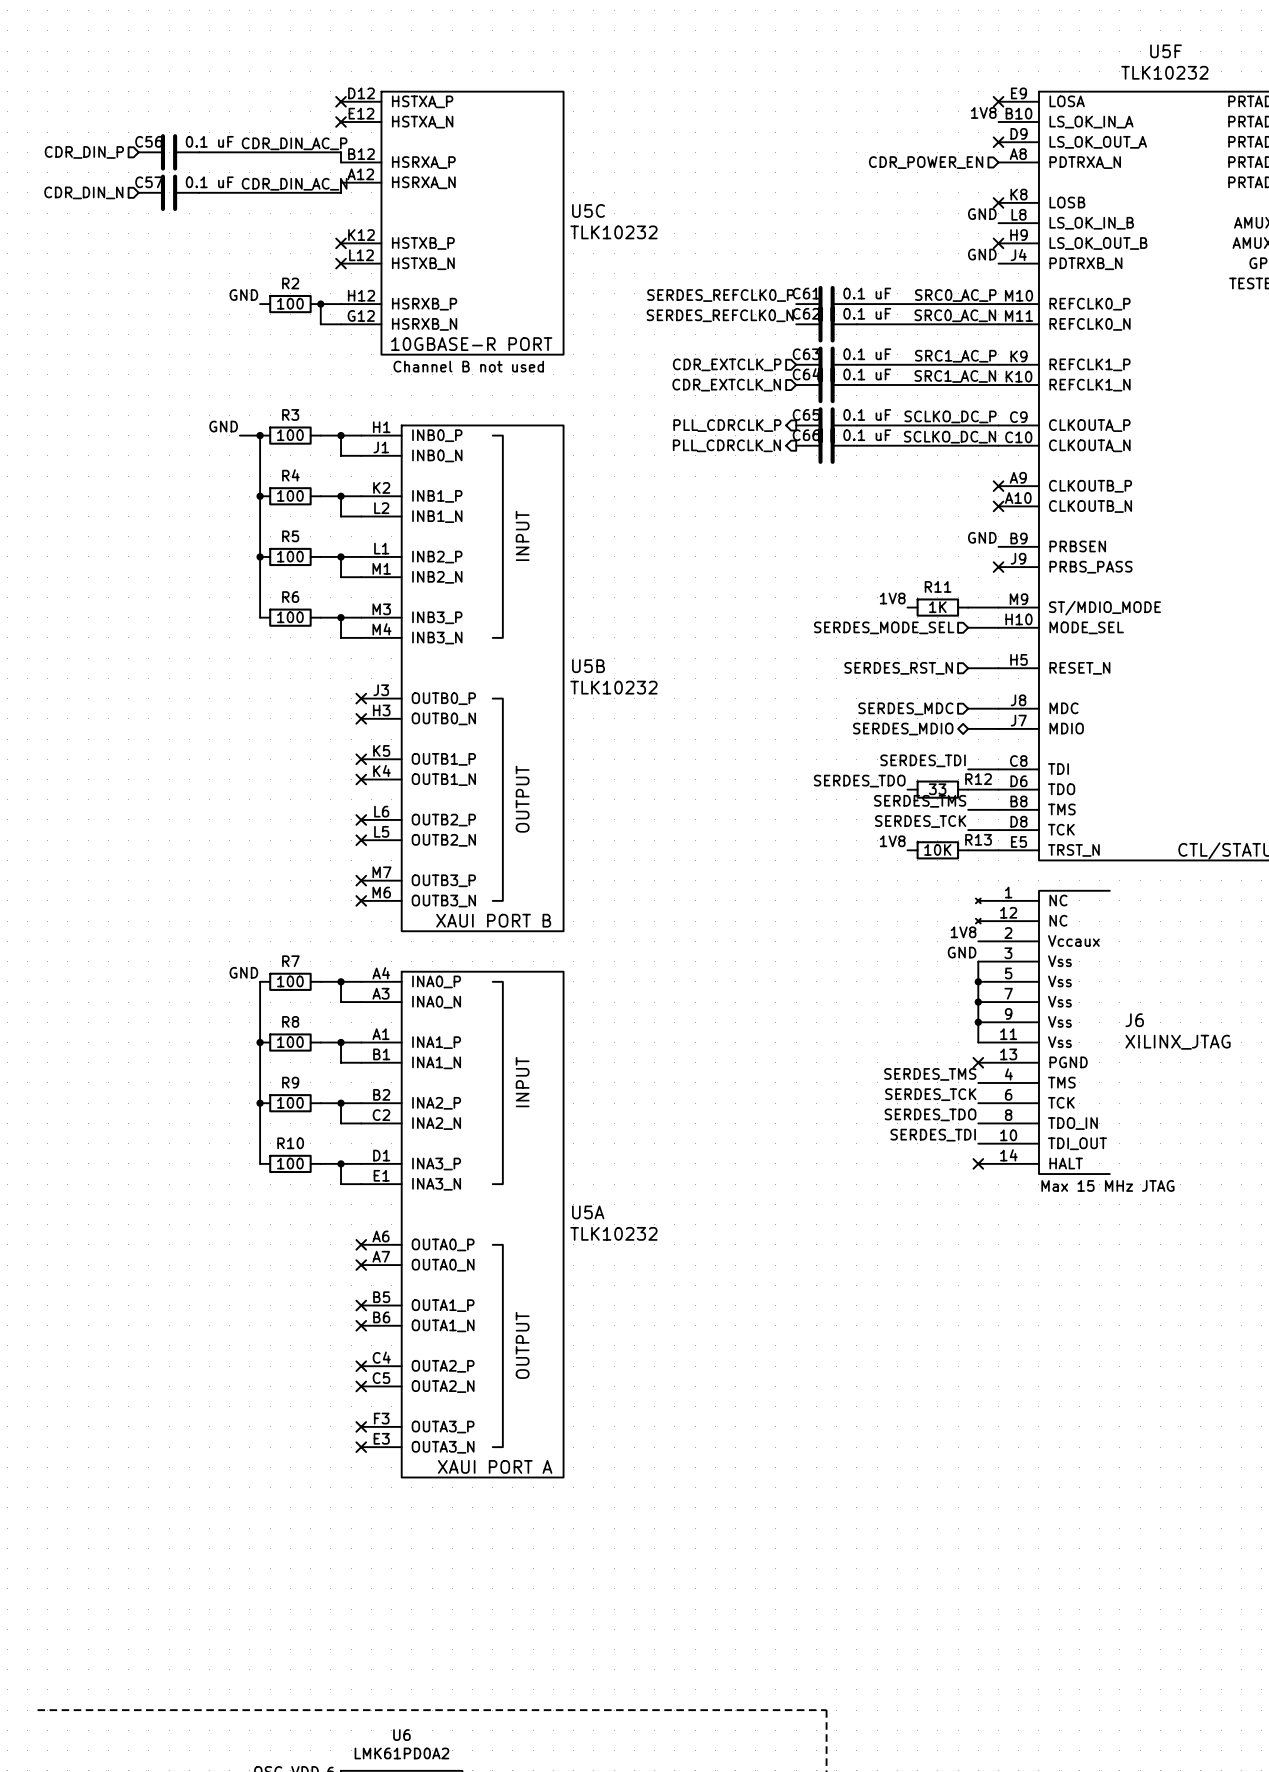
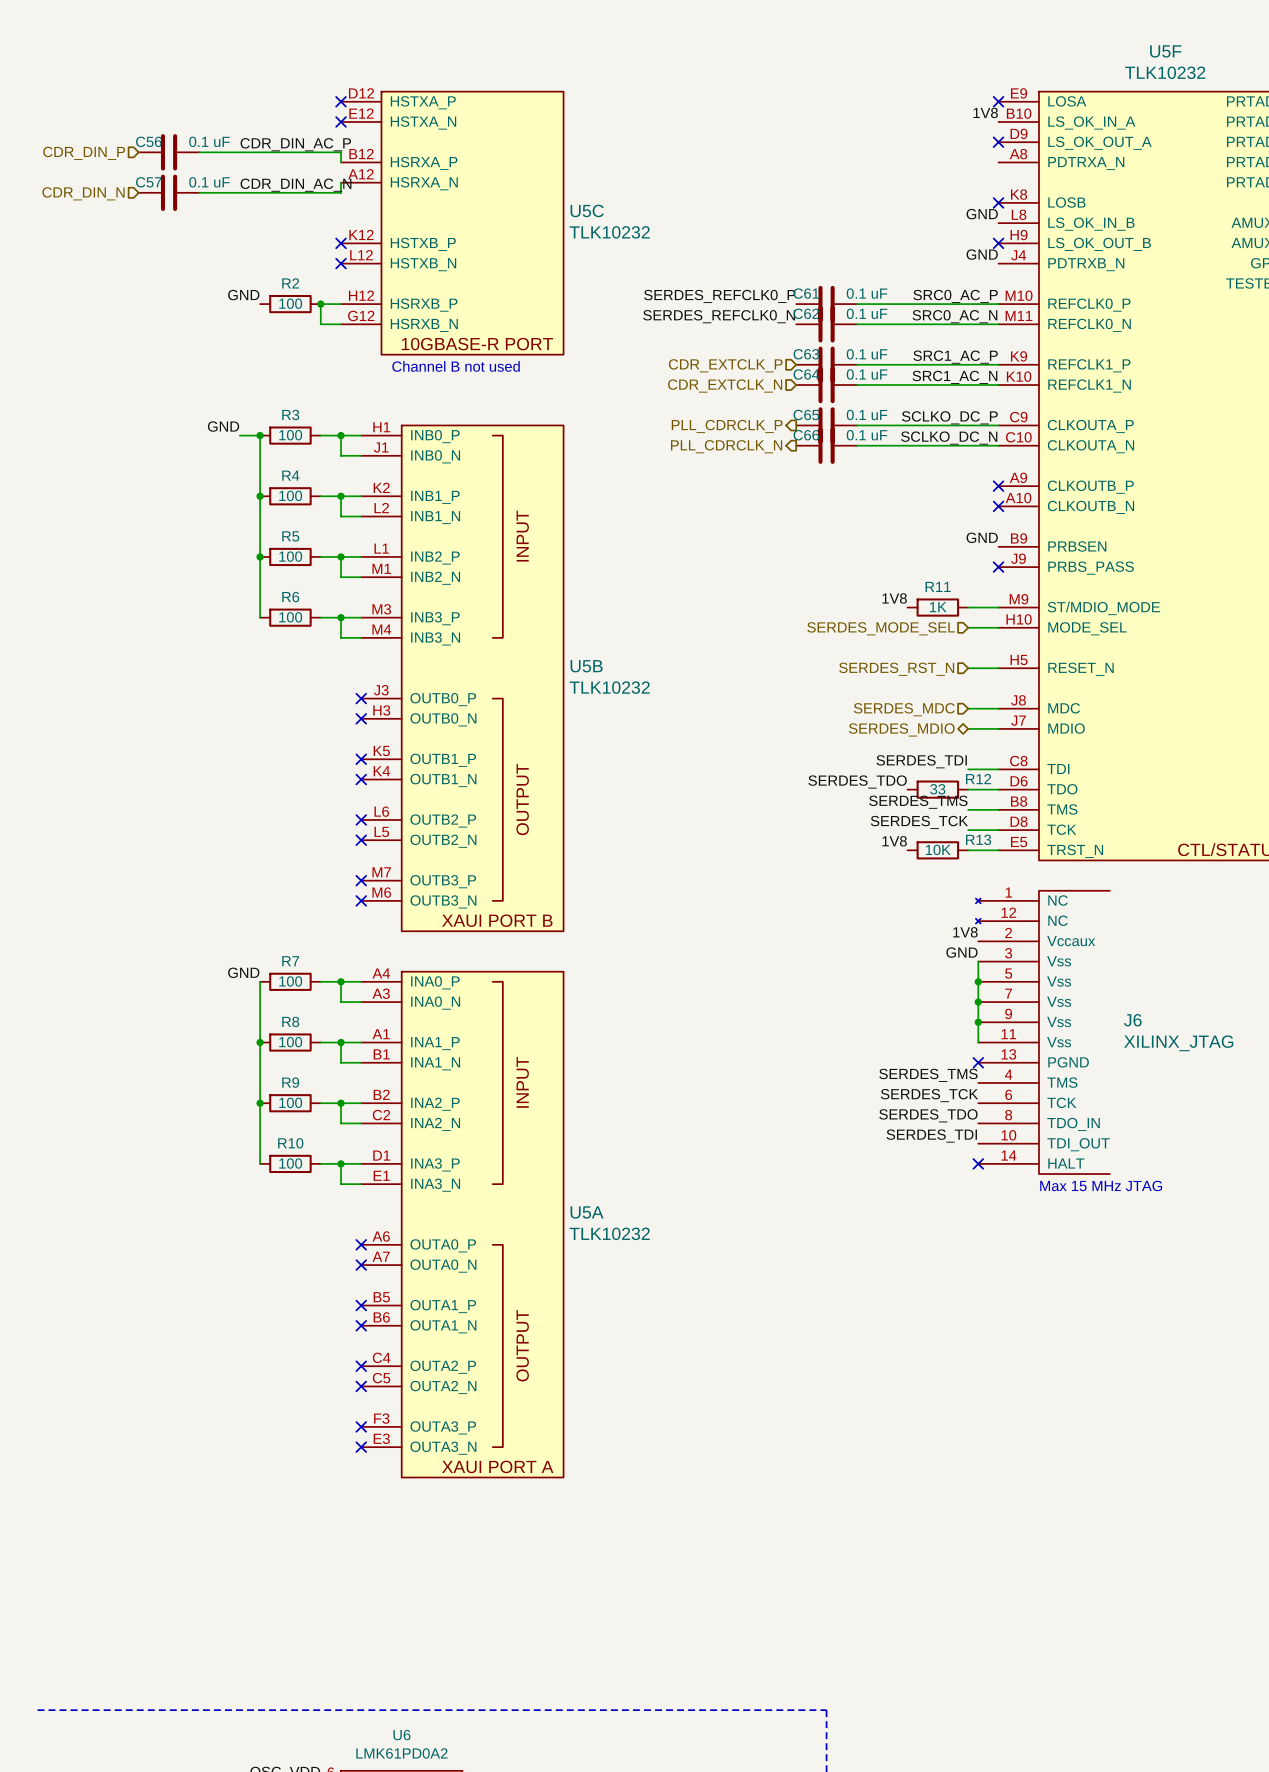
hierarchical label: CDR_POWER_EN (926, 162) -> none

